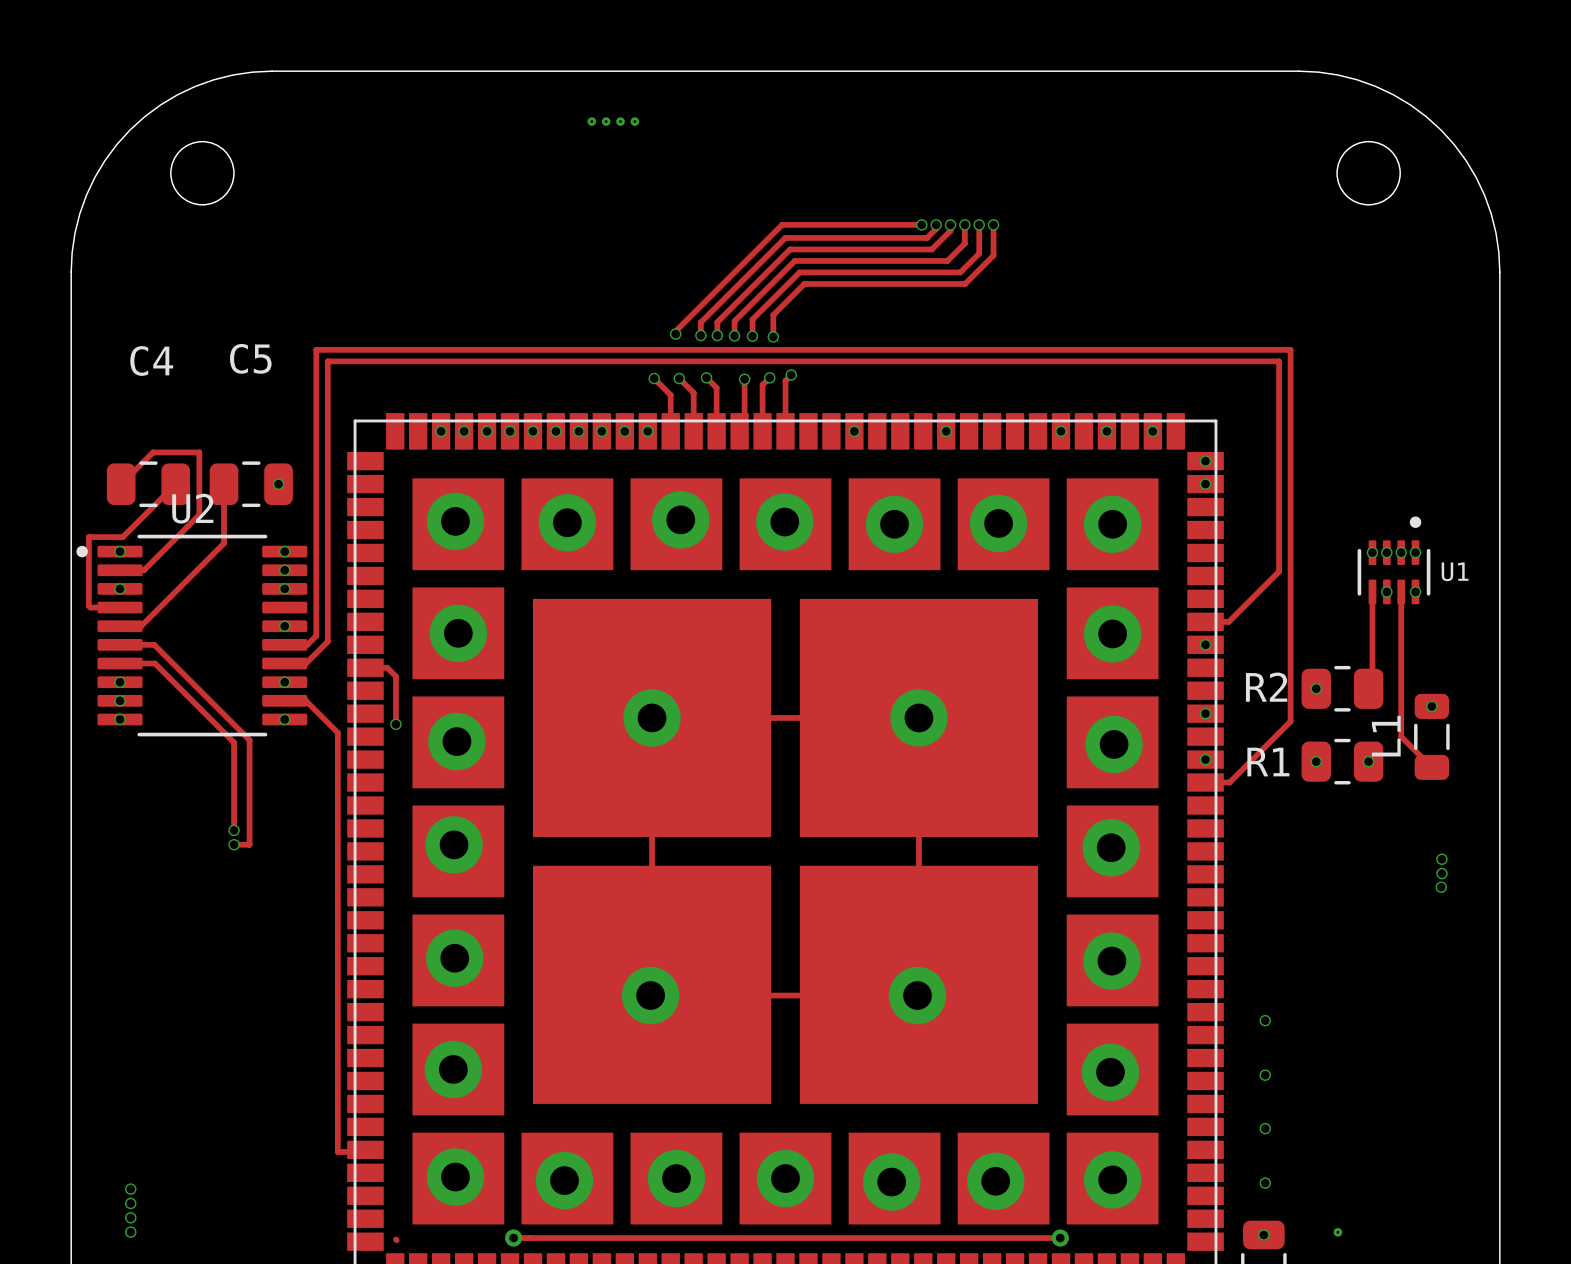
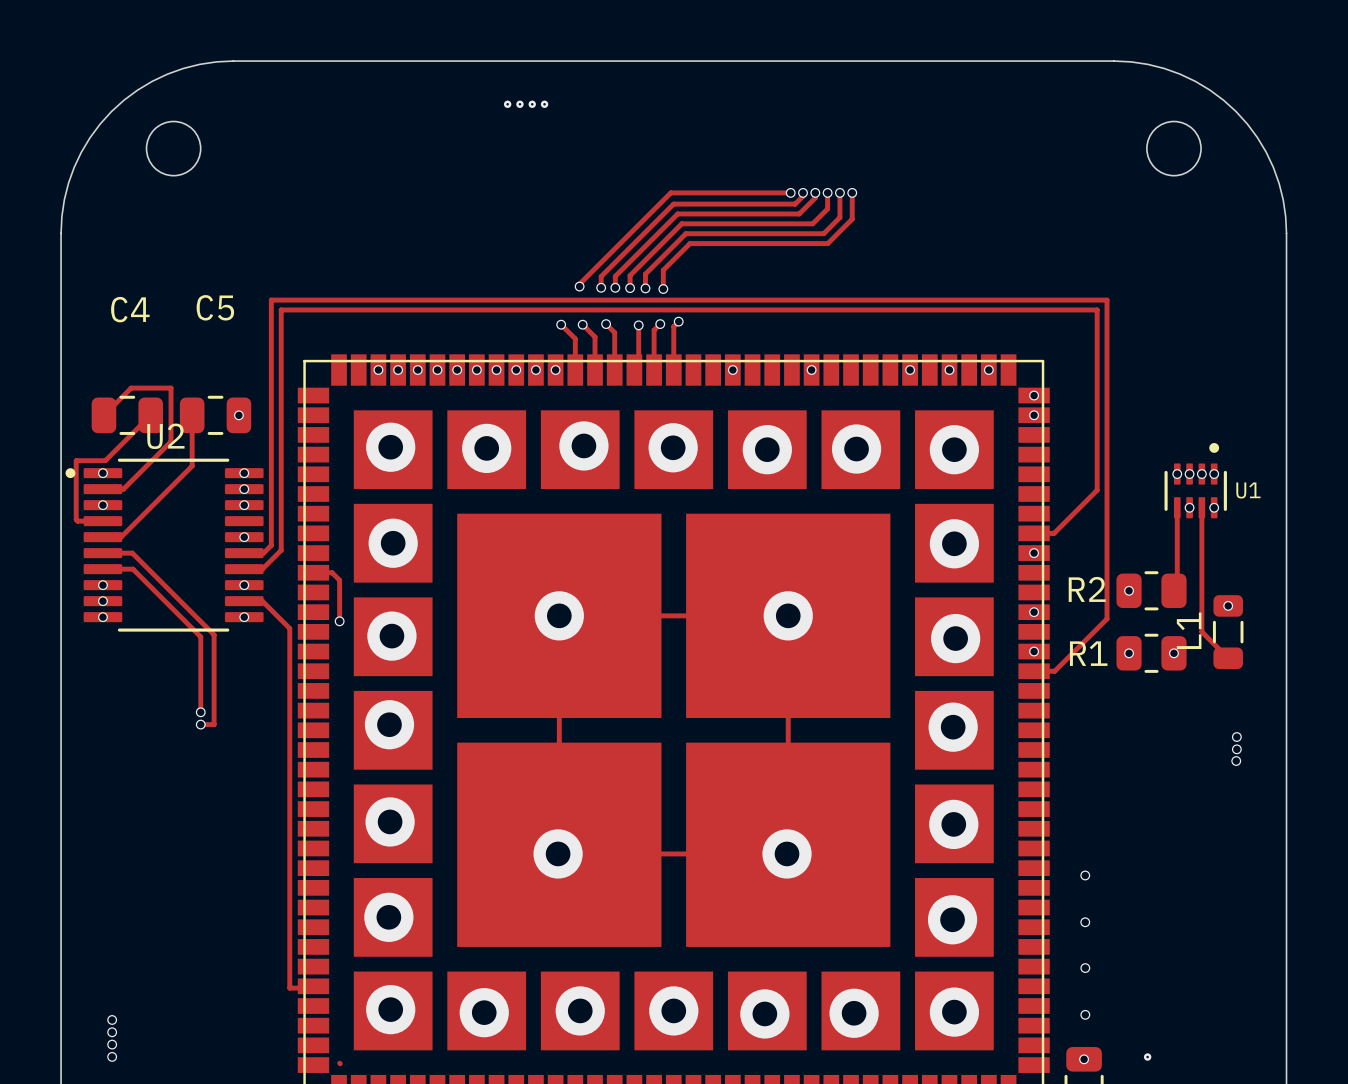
track: (513, 1238) (1060, 1238) -> none
via: (513, 1238) -> none
via: (1060, 1238) -> none

